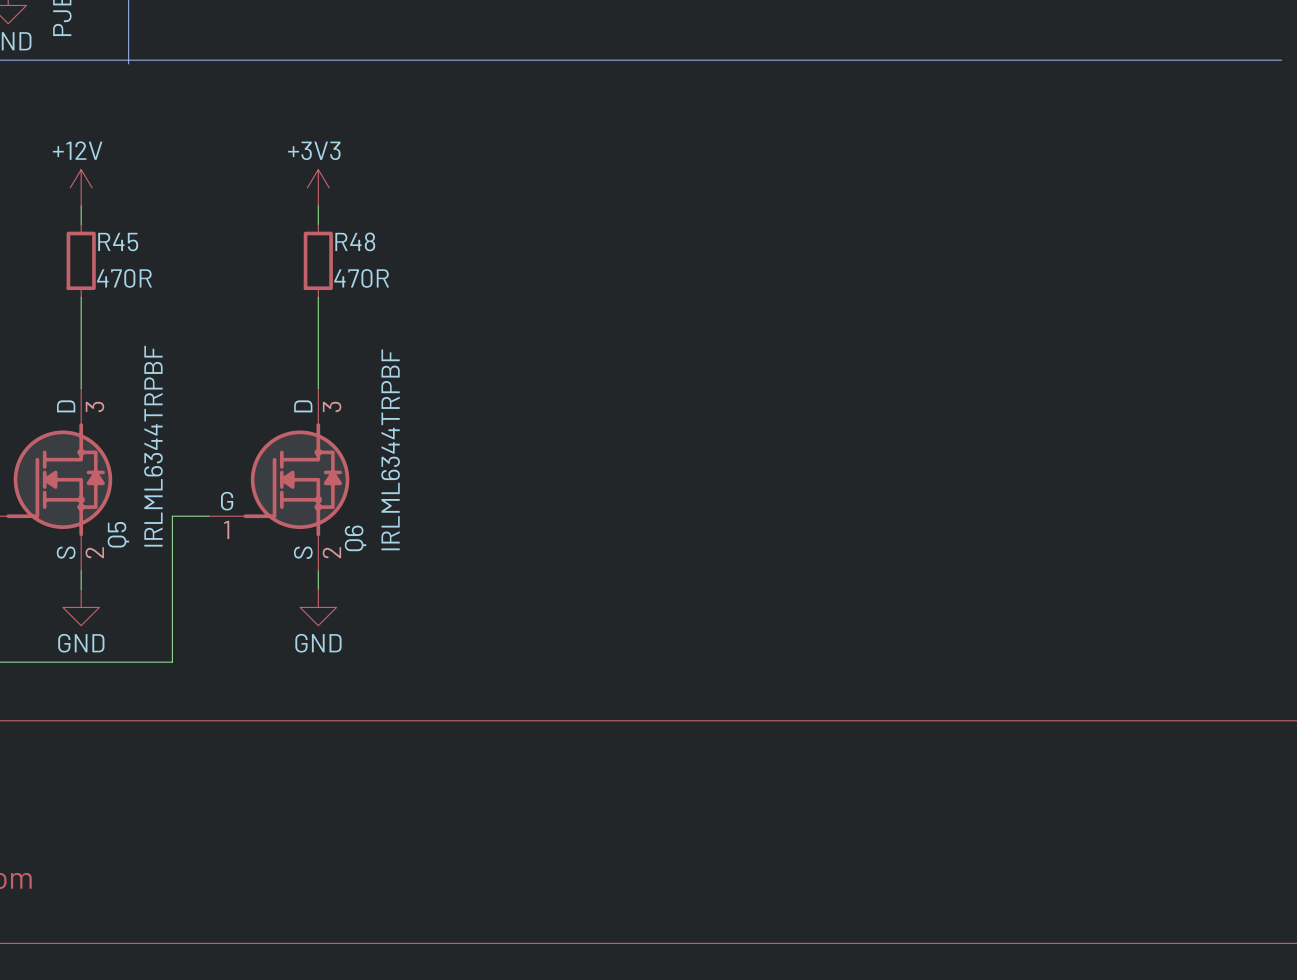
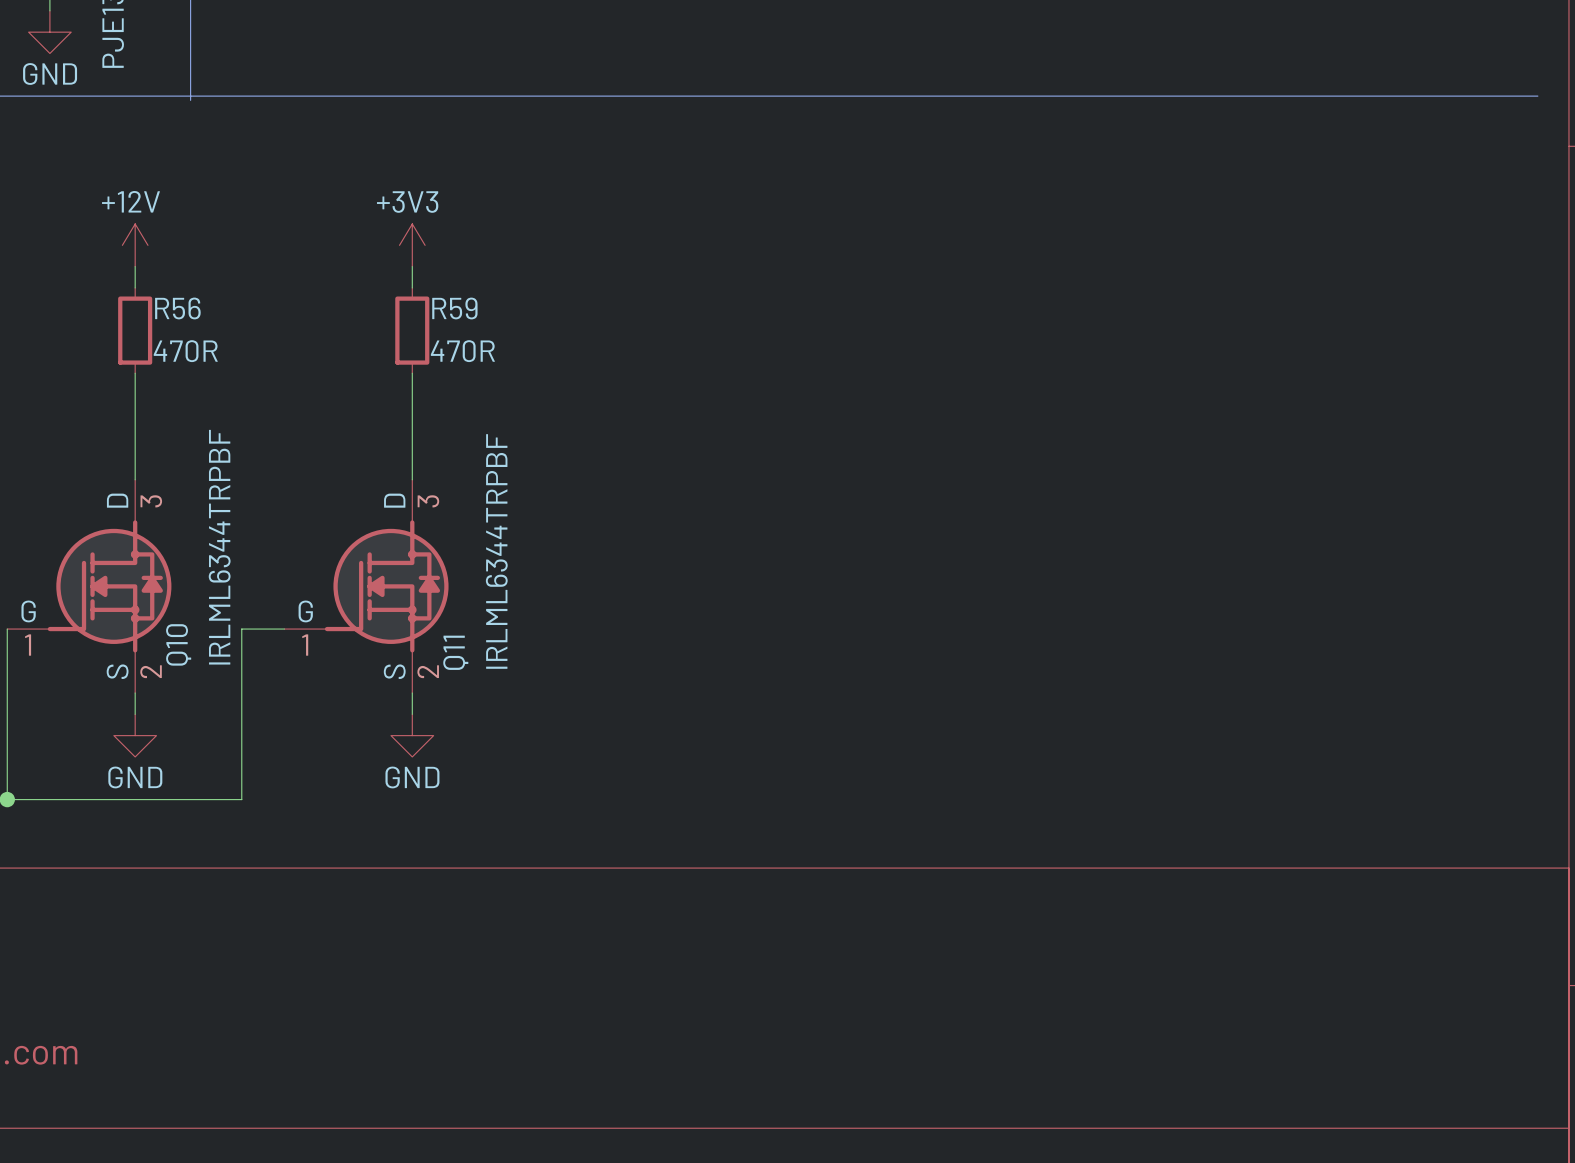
R48 name: R48 (355, 241) -> R59 (454, 308)
R45 name: R45 (118, 242) -> R56 (177, 308)
Q5 name: Q5 (118, 534) -> Q10 (178, 644)
Q6 name: Q6 (355, 538) -> Q11 (455, 652)

